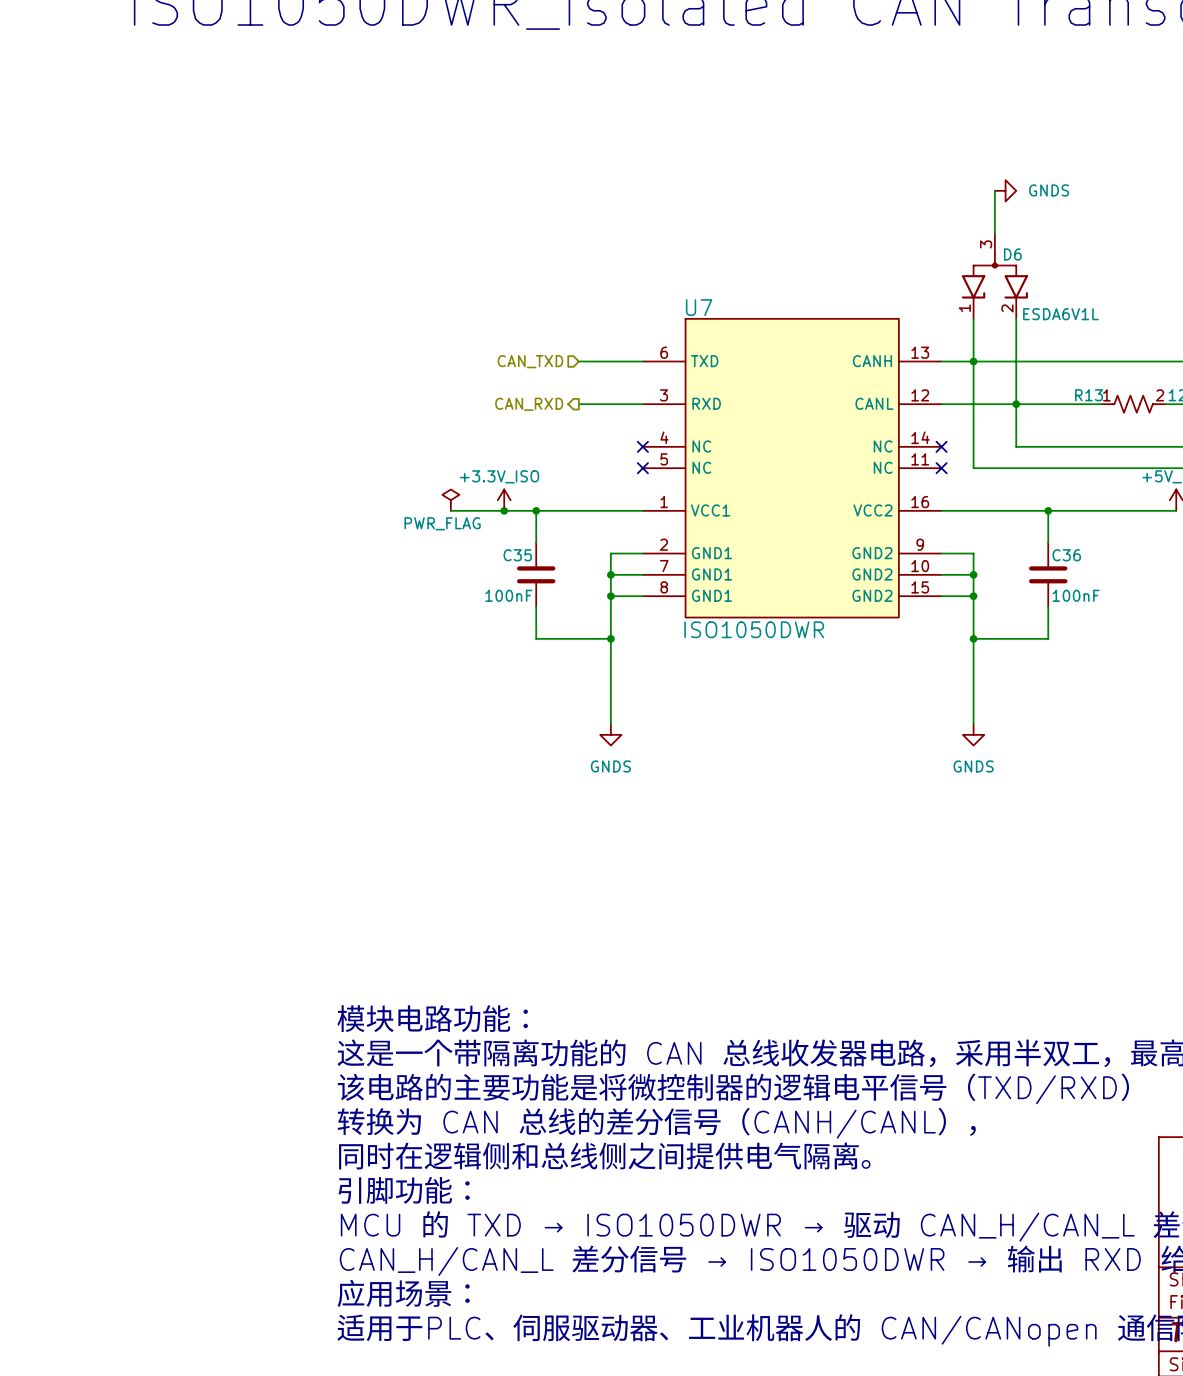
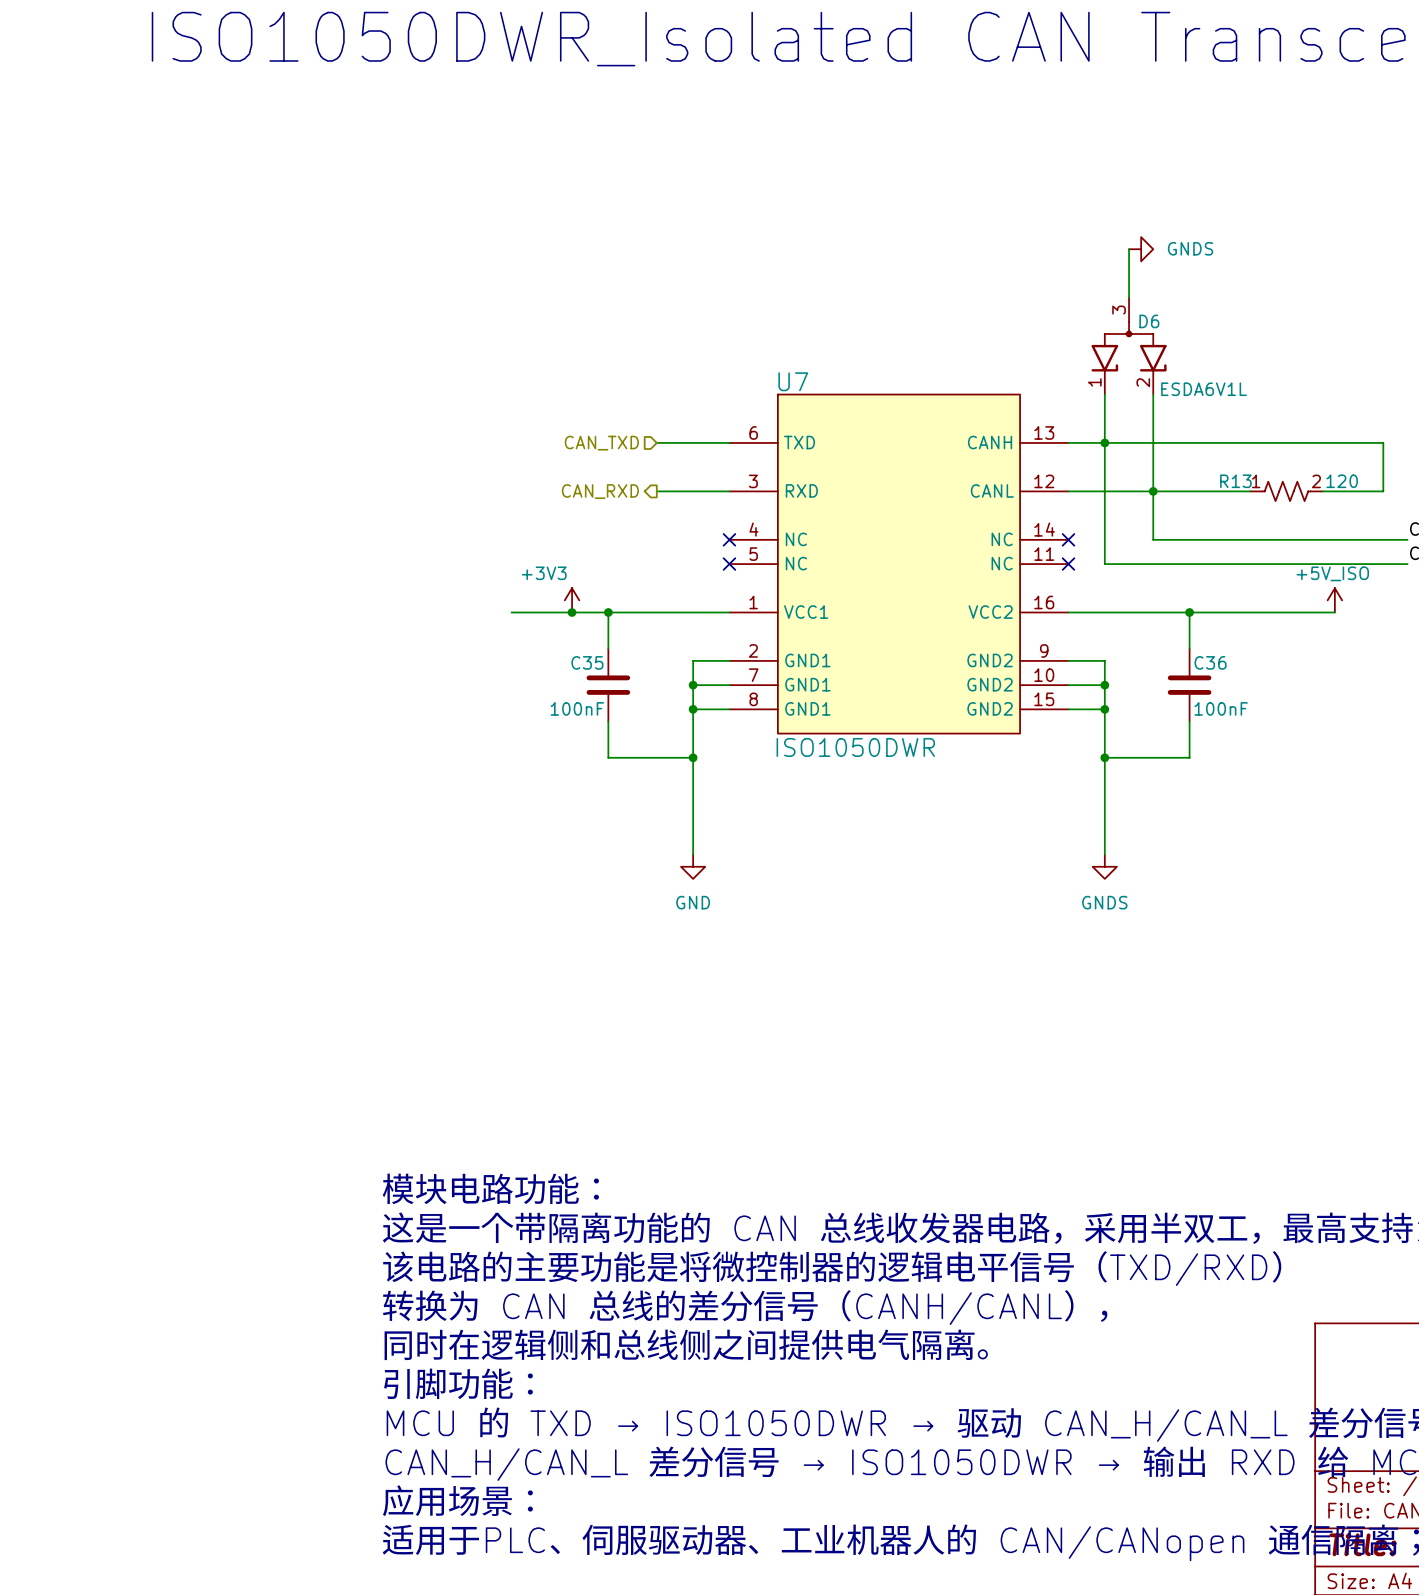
power symbol: PWR_FLAG (450, 500) -> none
power symbol: +3.3V_ISO (504, 500) -> +3V3 (572, 600)
power symbol: GNDS (610, 734) -> GND (693, 866)

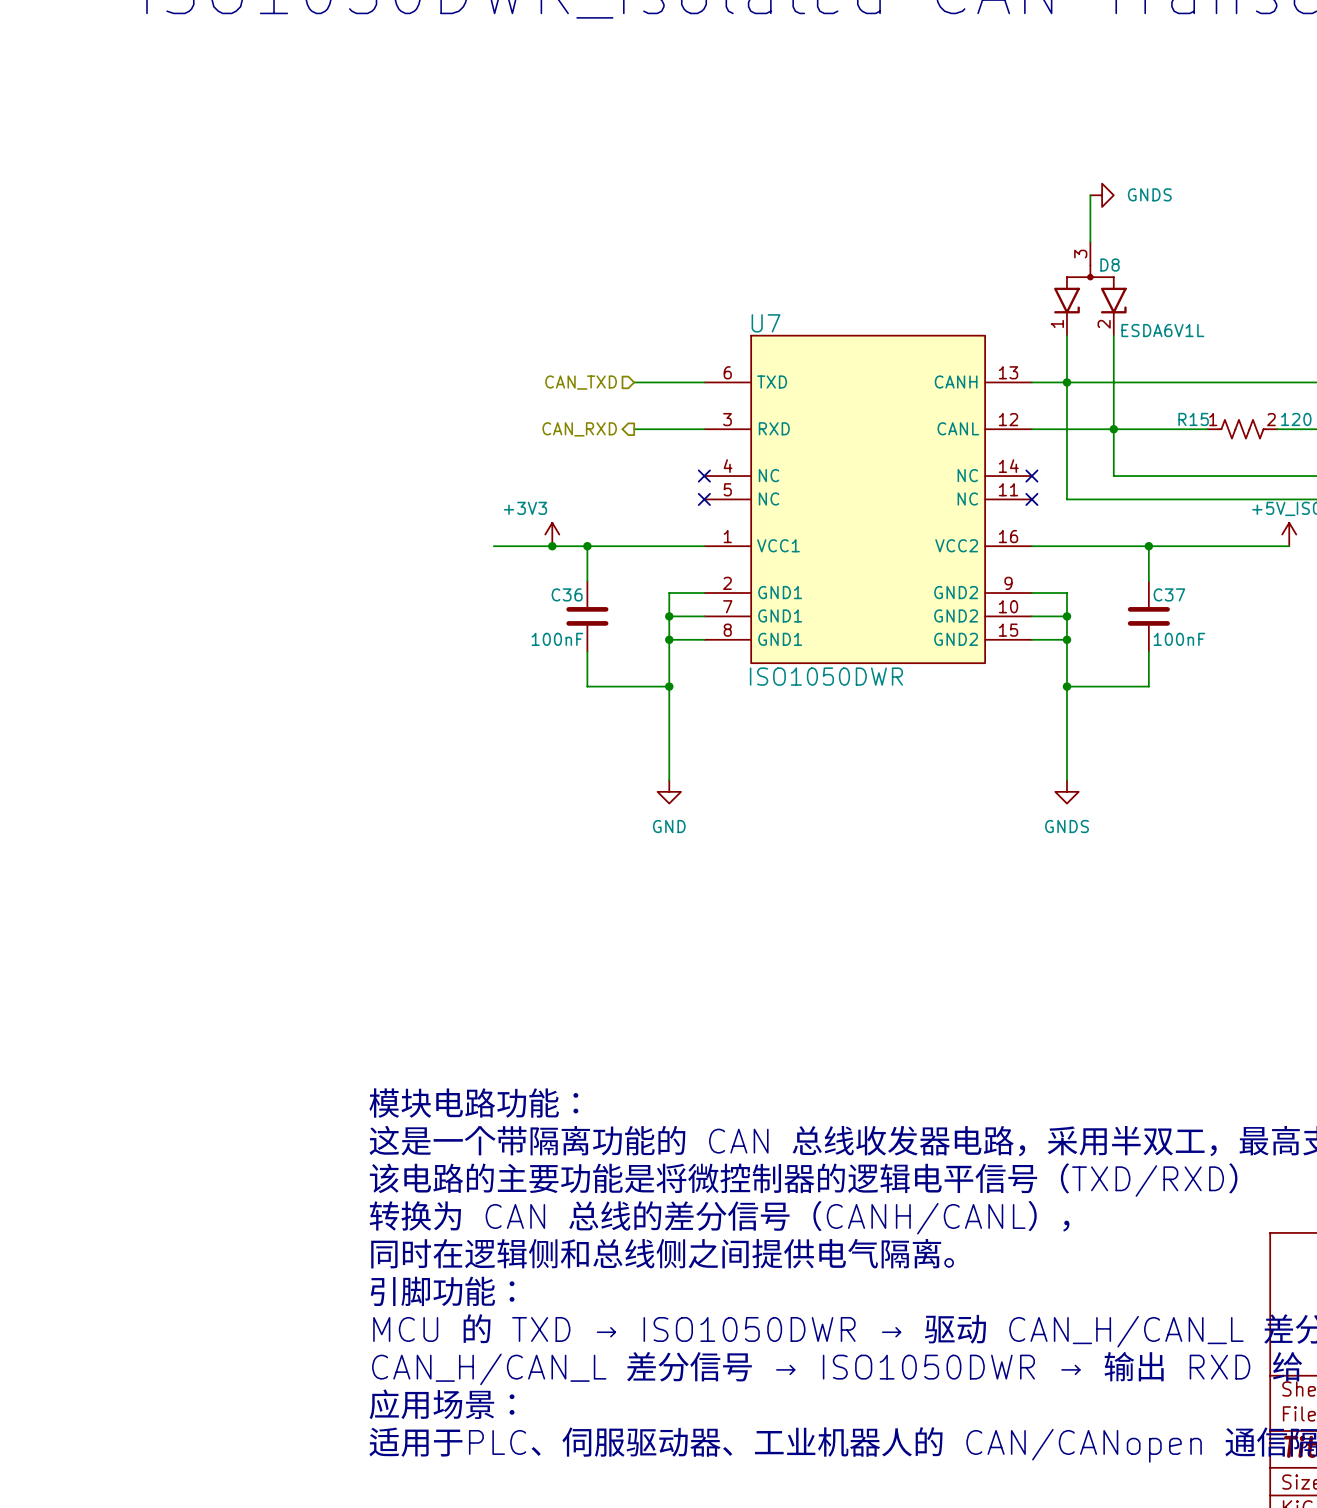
D6 name: D6 (1149, 321) -> D8 (1110, 265)
R13 name: R13 (1235, 481) -> R15 (1193, 419)
C35 name: C35 (587, 662) -> C36 (567, 594)
C36 name: C36 (1210, 662) -> C37 (1169, 594)

